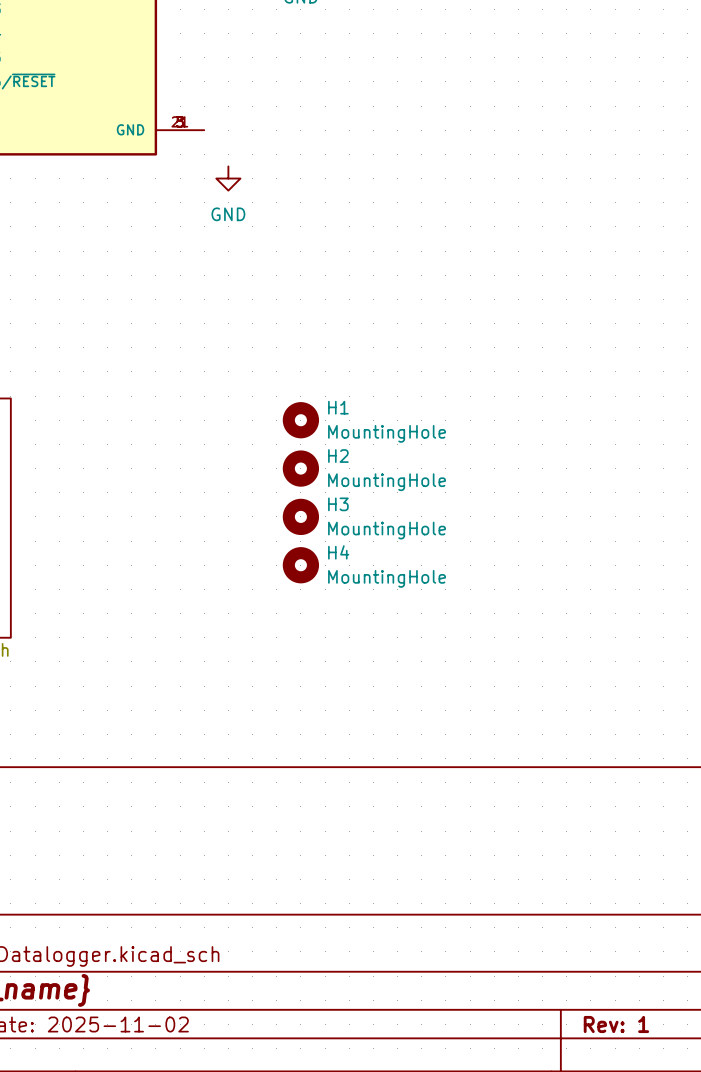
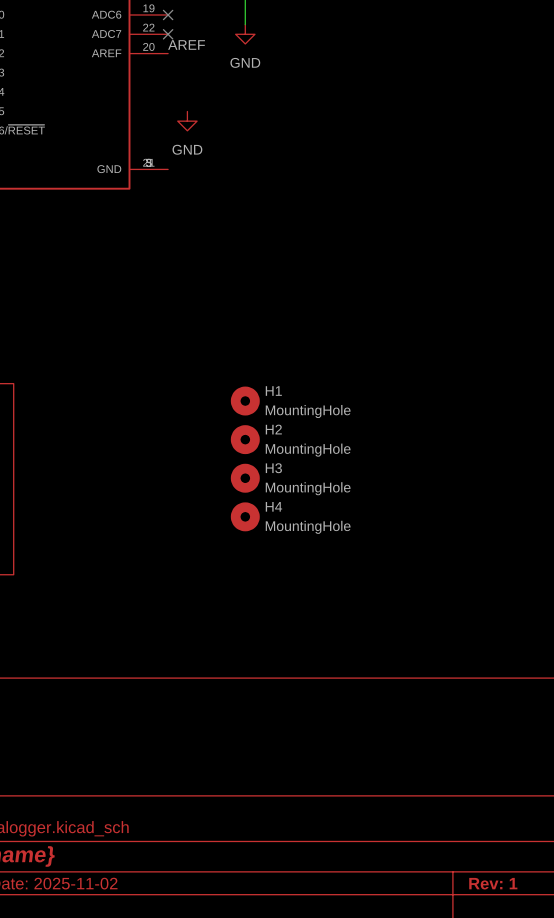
power symbol position: GND (228, 178) -> GND (187, 121)

